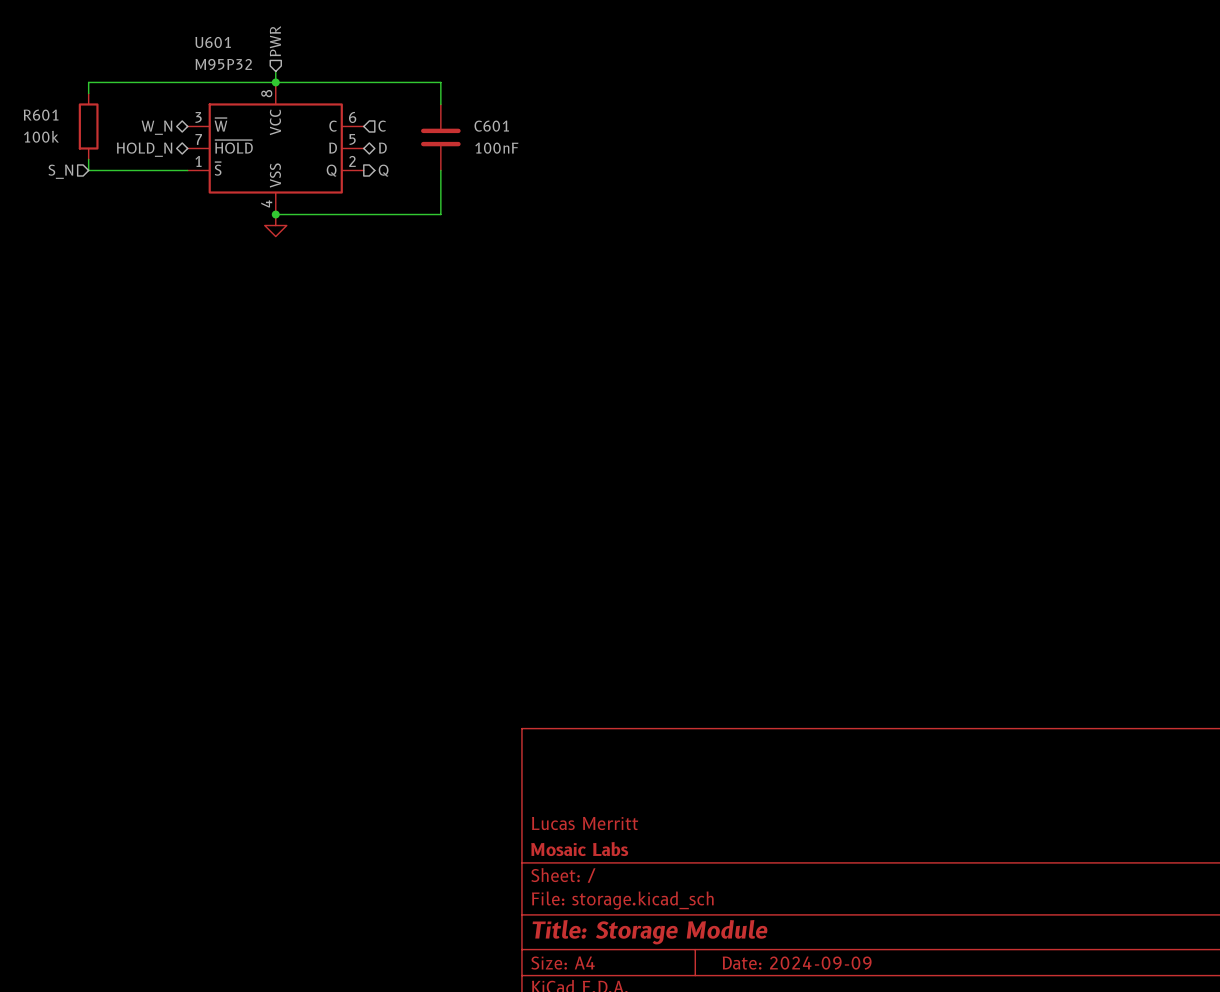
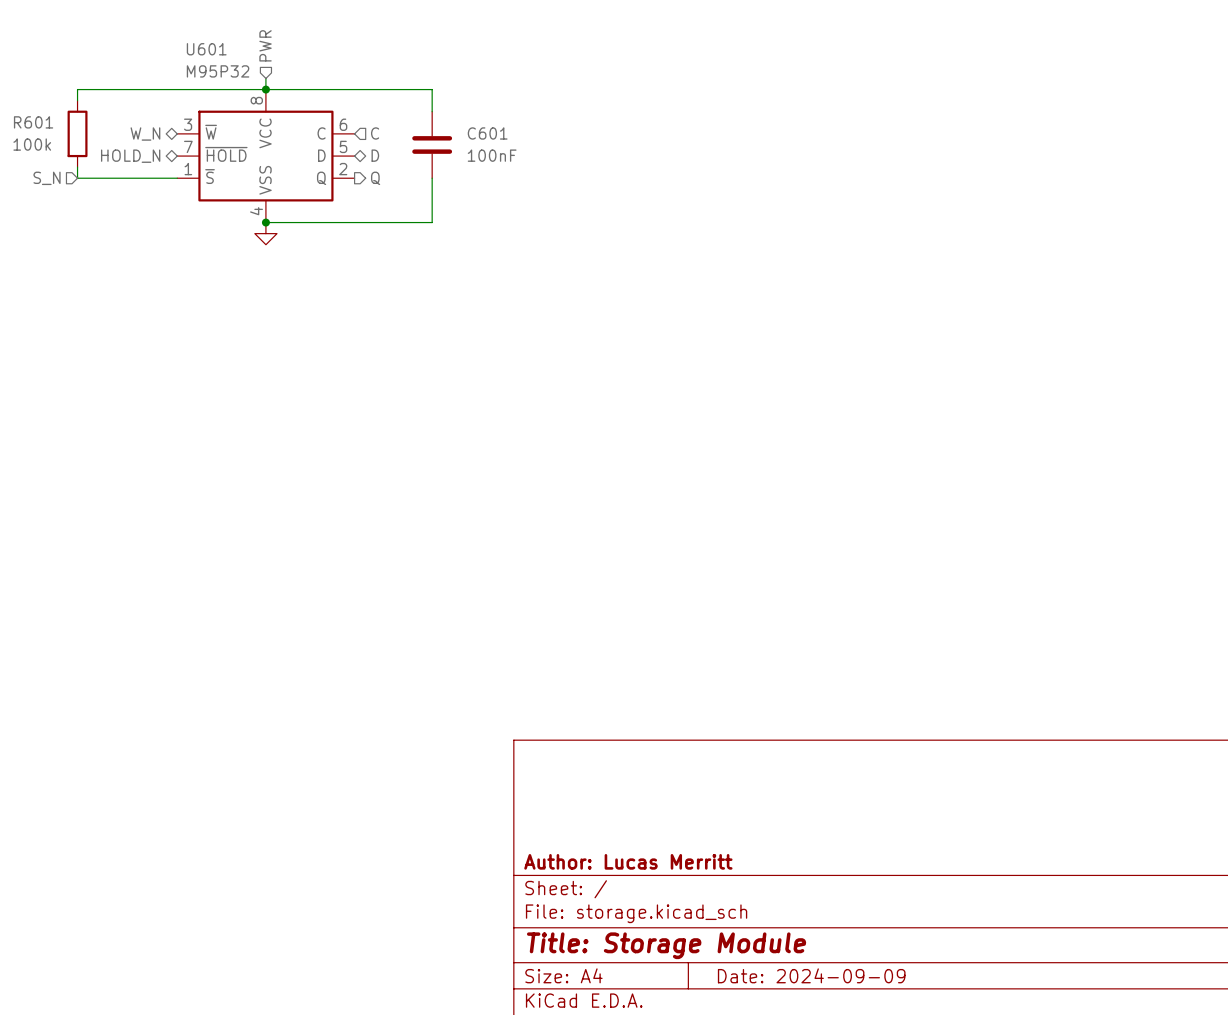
title block: Lucas Merritt (585, 823) -> none
title block: Mosaic Labs (579, 849) -> Author: Lucas Merritt (628, 861)

